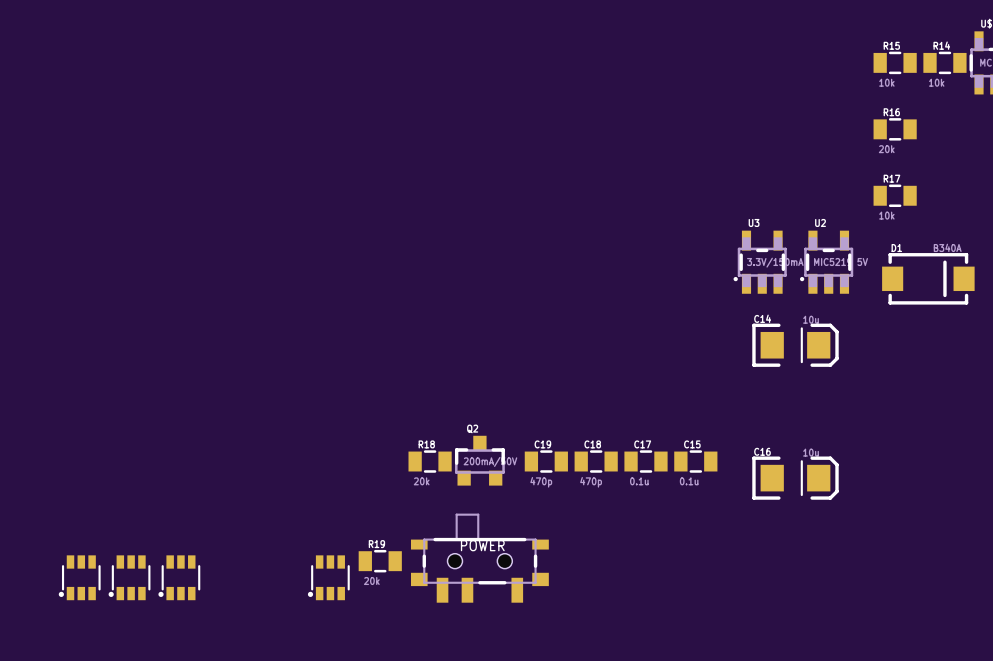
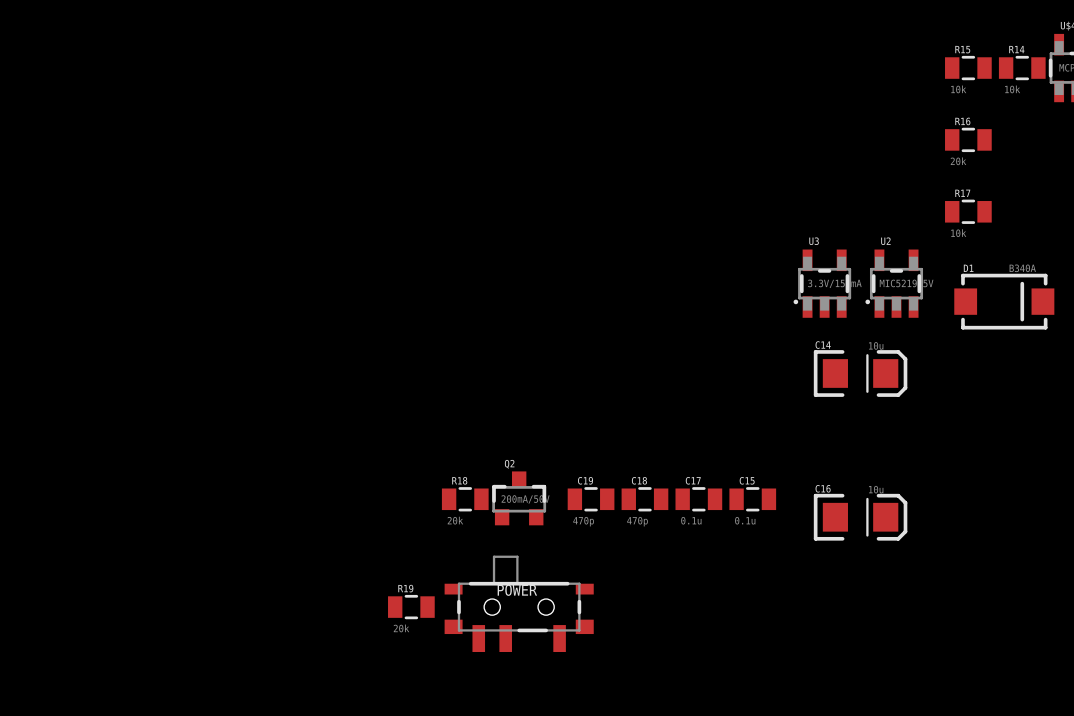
part: (79, 577) -> none
part: (129, 577) -> none
part: (179, 577) -> none
part: (328, 577) -> none

